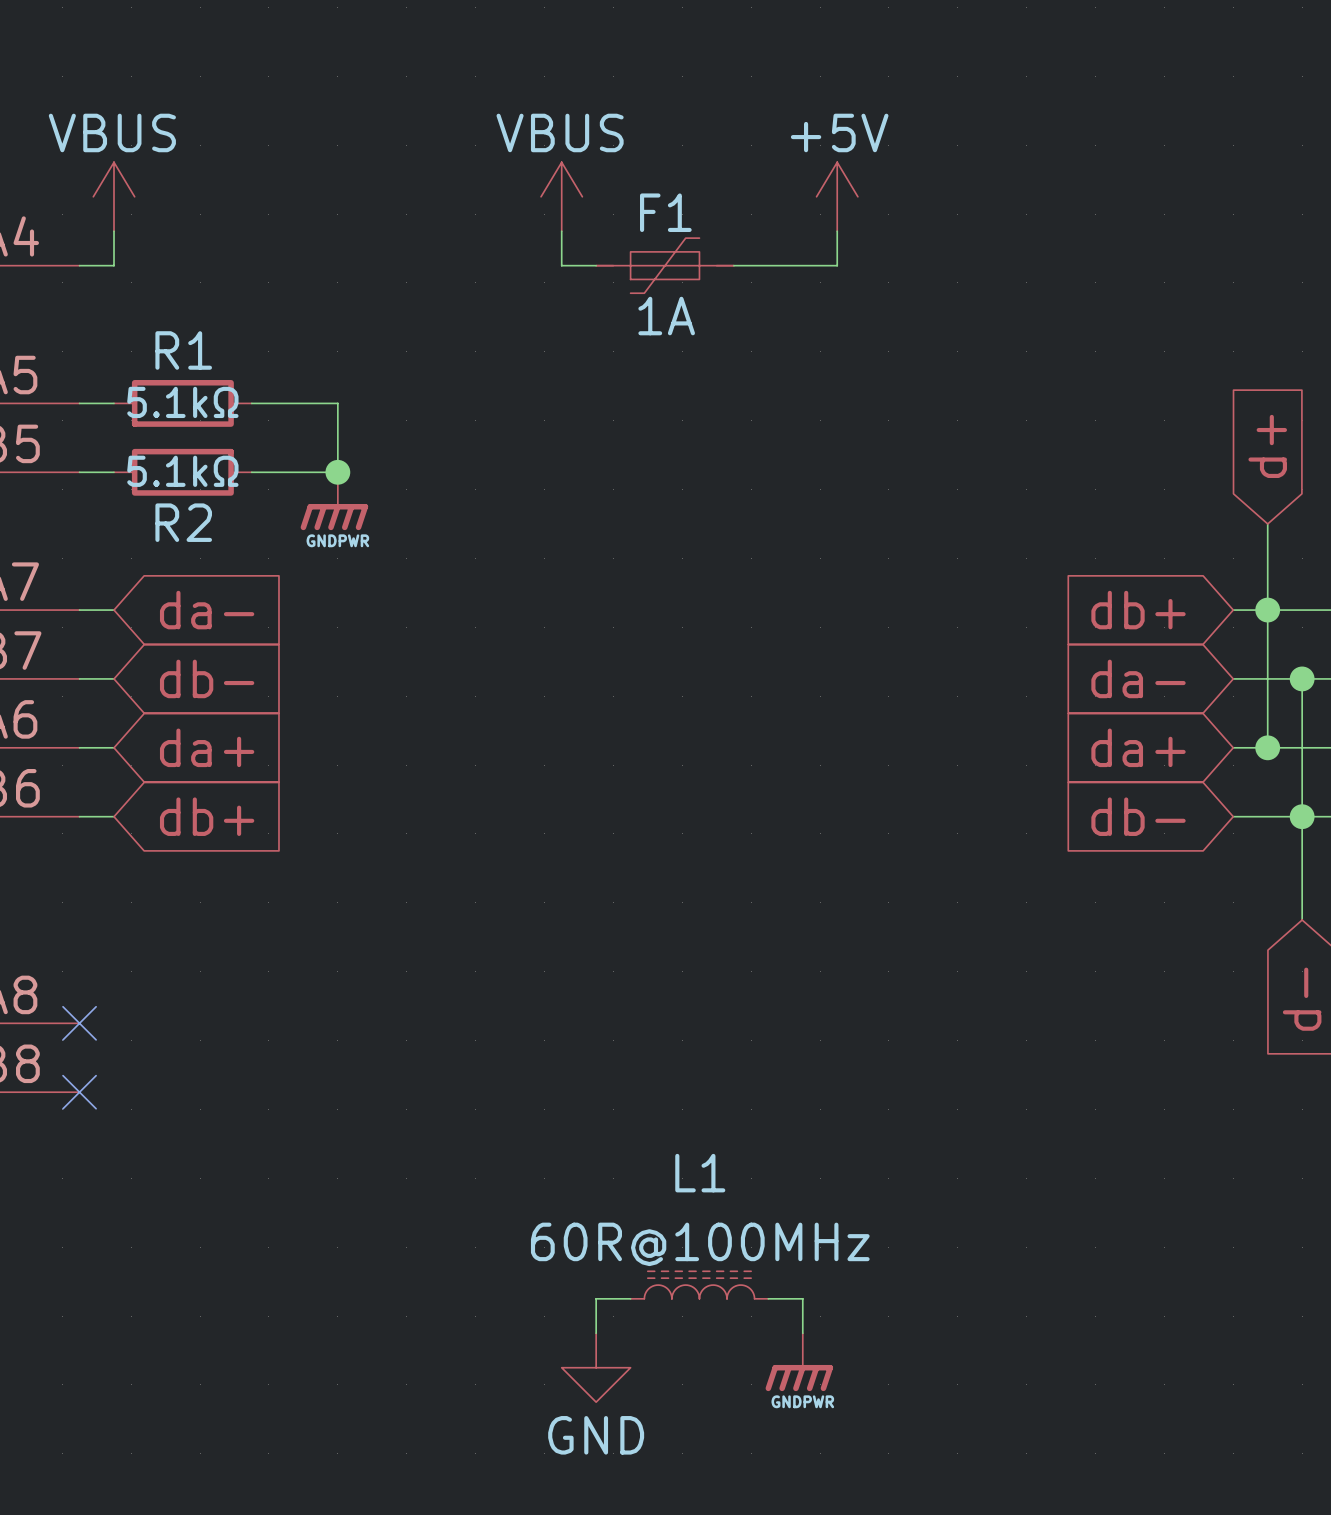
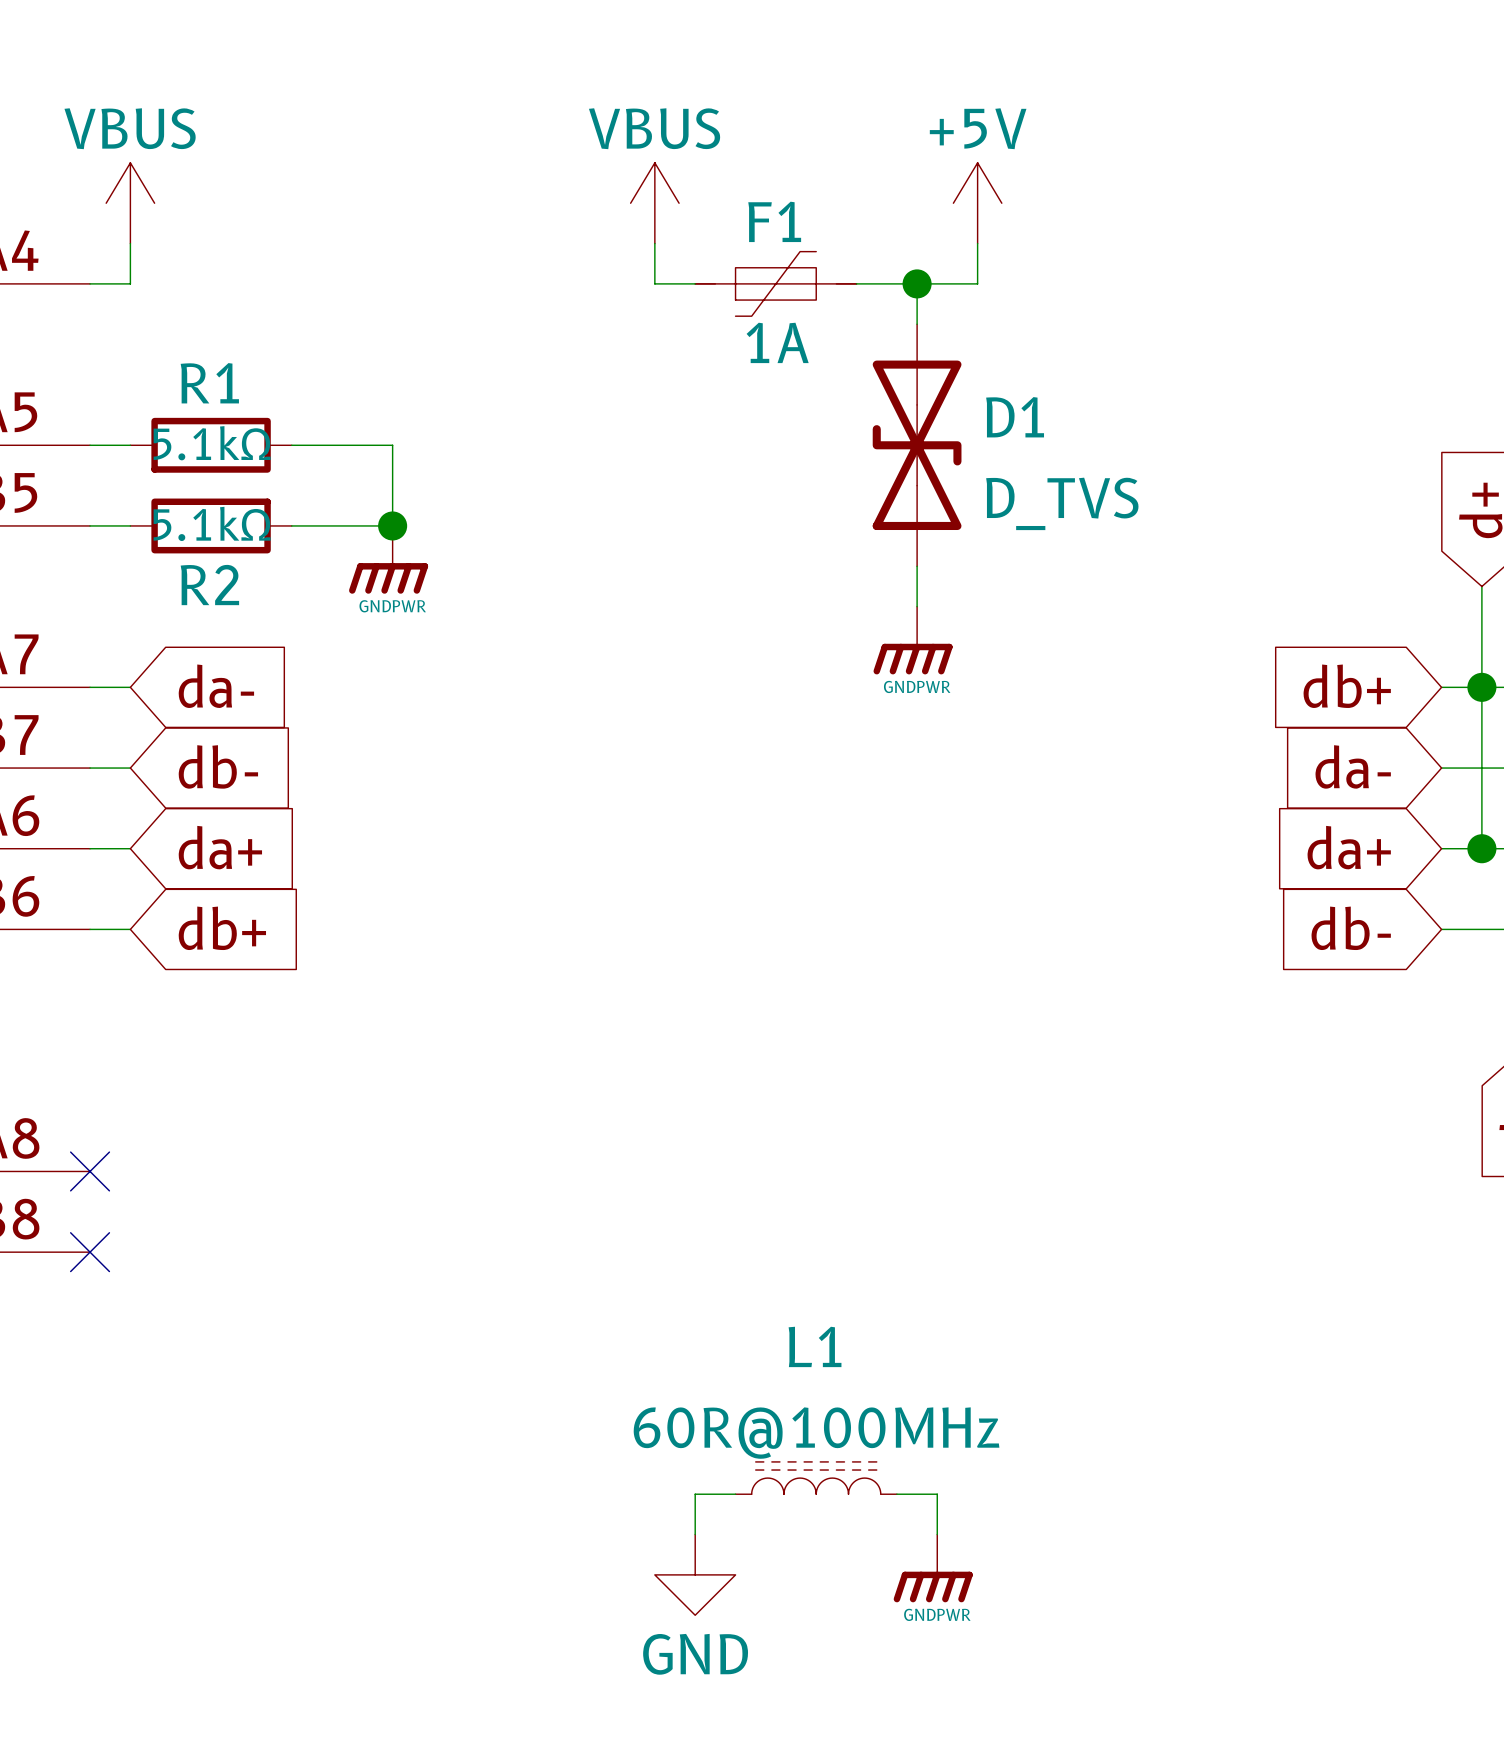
wire: none -> (917, 283) (917, 324)
junction: none -> (917, 283)
D1: none -> D_TVS (917, 445)
wire: none -> (917, 566) (917, 606)
power symbol: none -> GNDPWR (913, 640)

